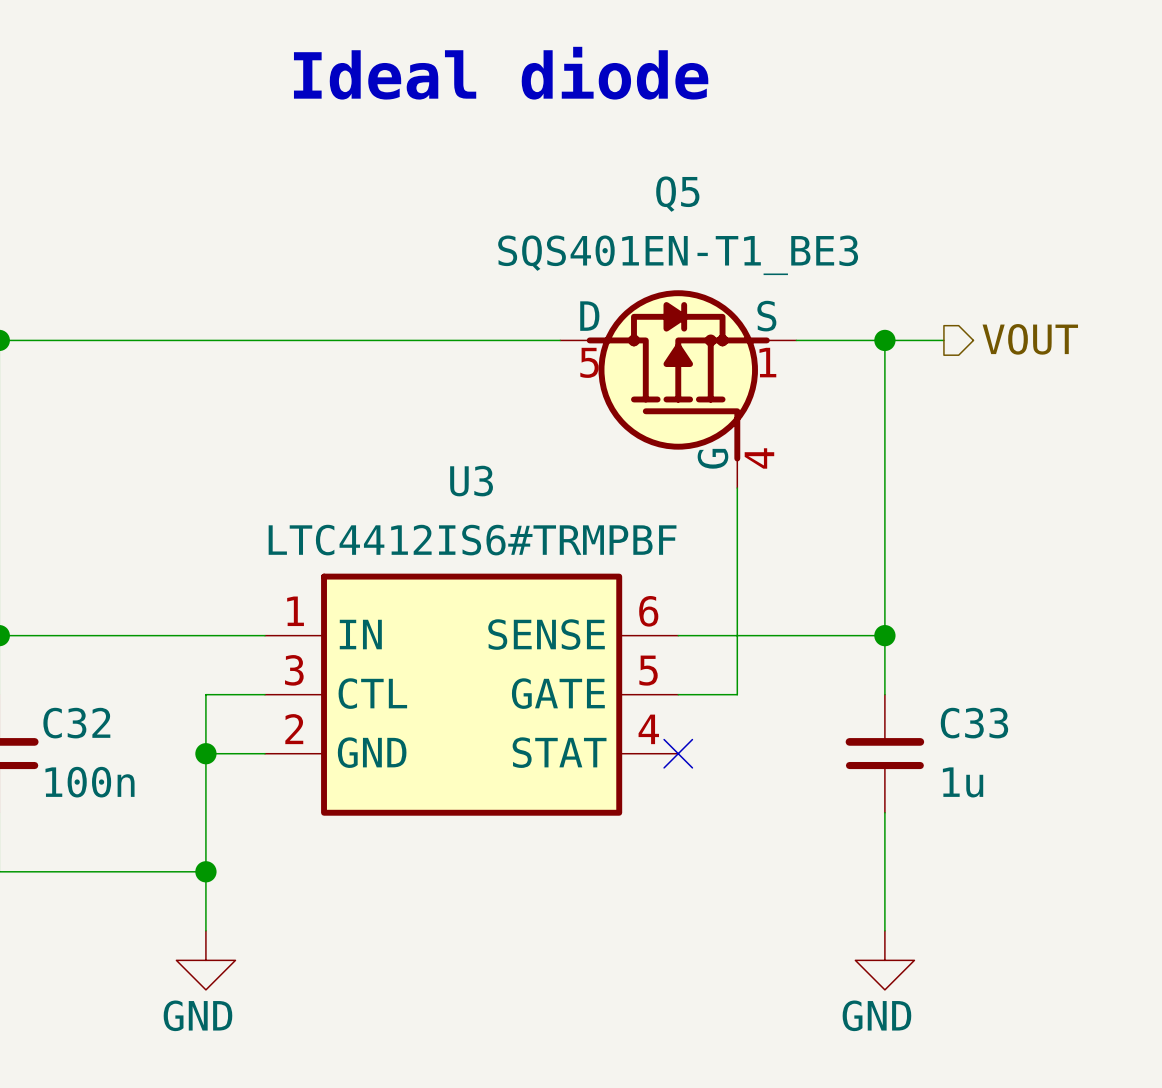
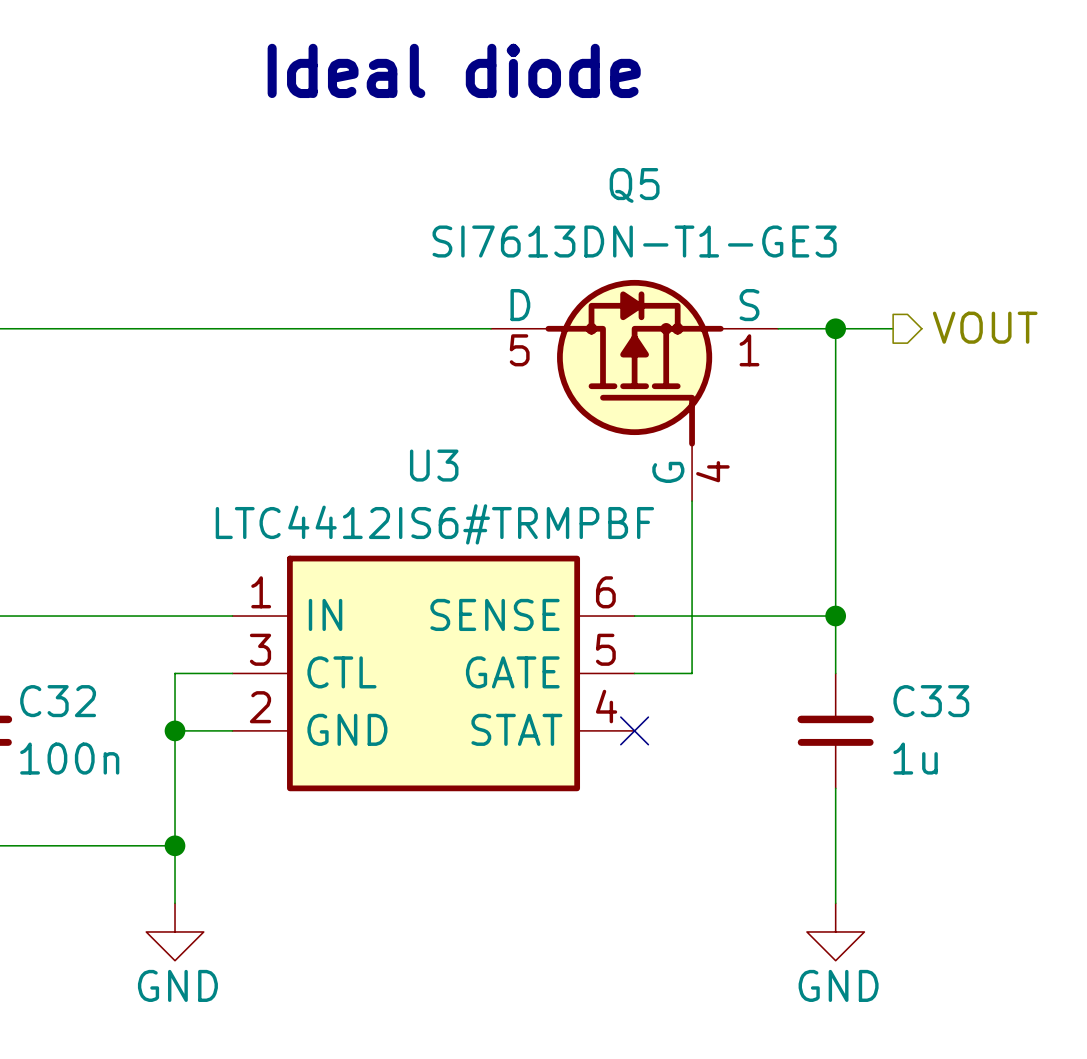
Q5 text: SQS401EN-T1_BE3 (678, 255) -> SI7613DN-T1-GE3 (634, 241)
Q5 symbol: [560, 290, 797, 489] -> [490, 279, 779, 502]

